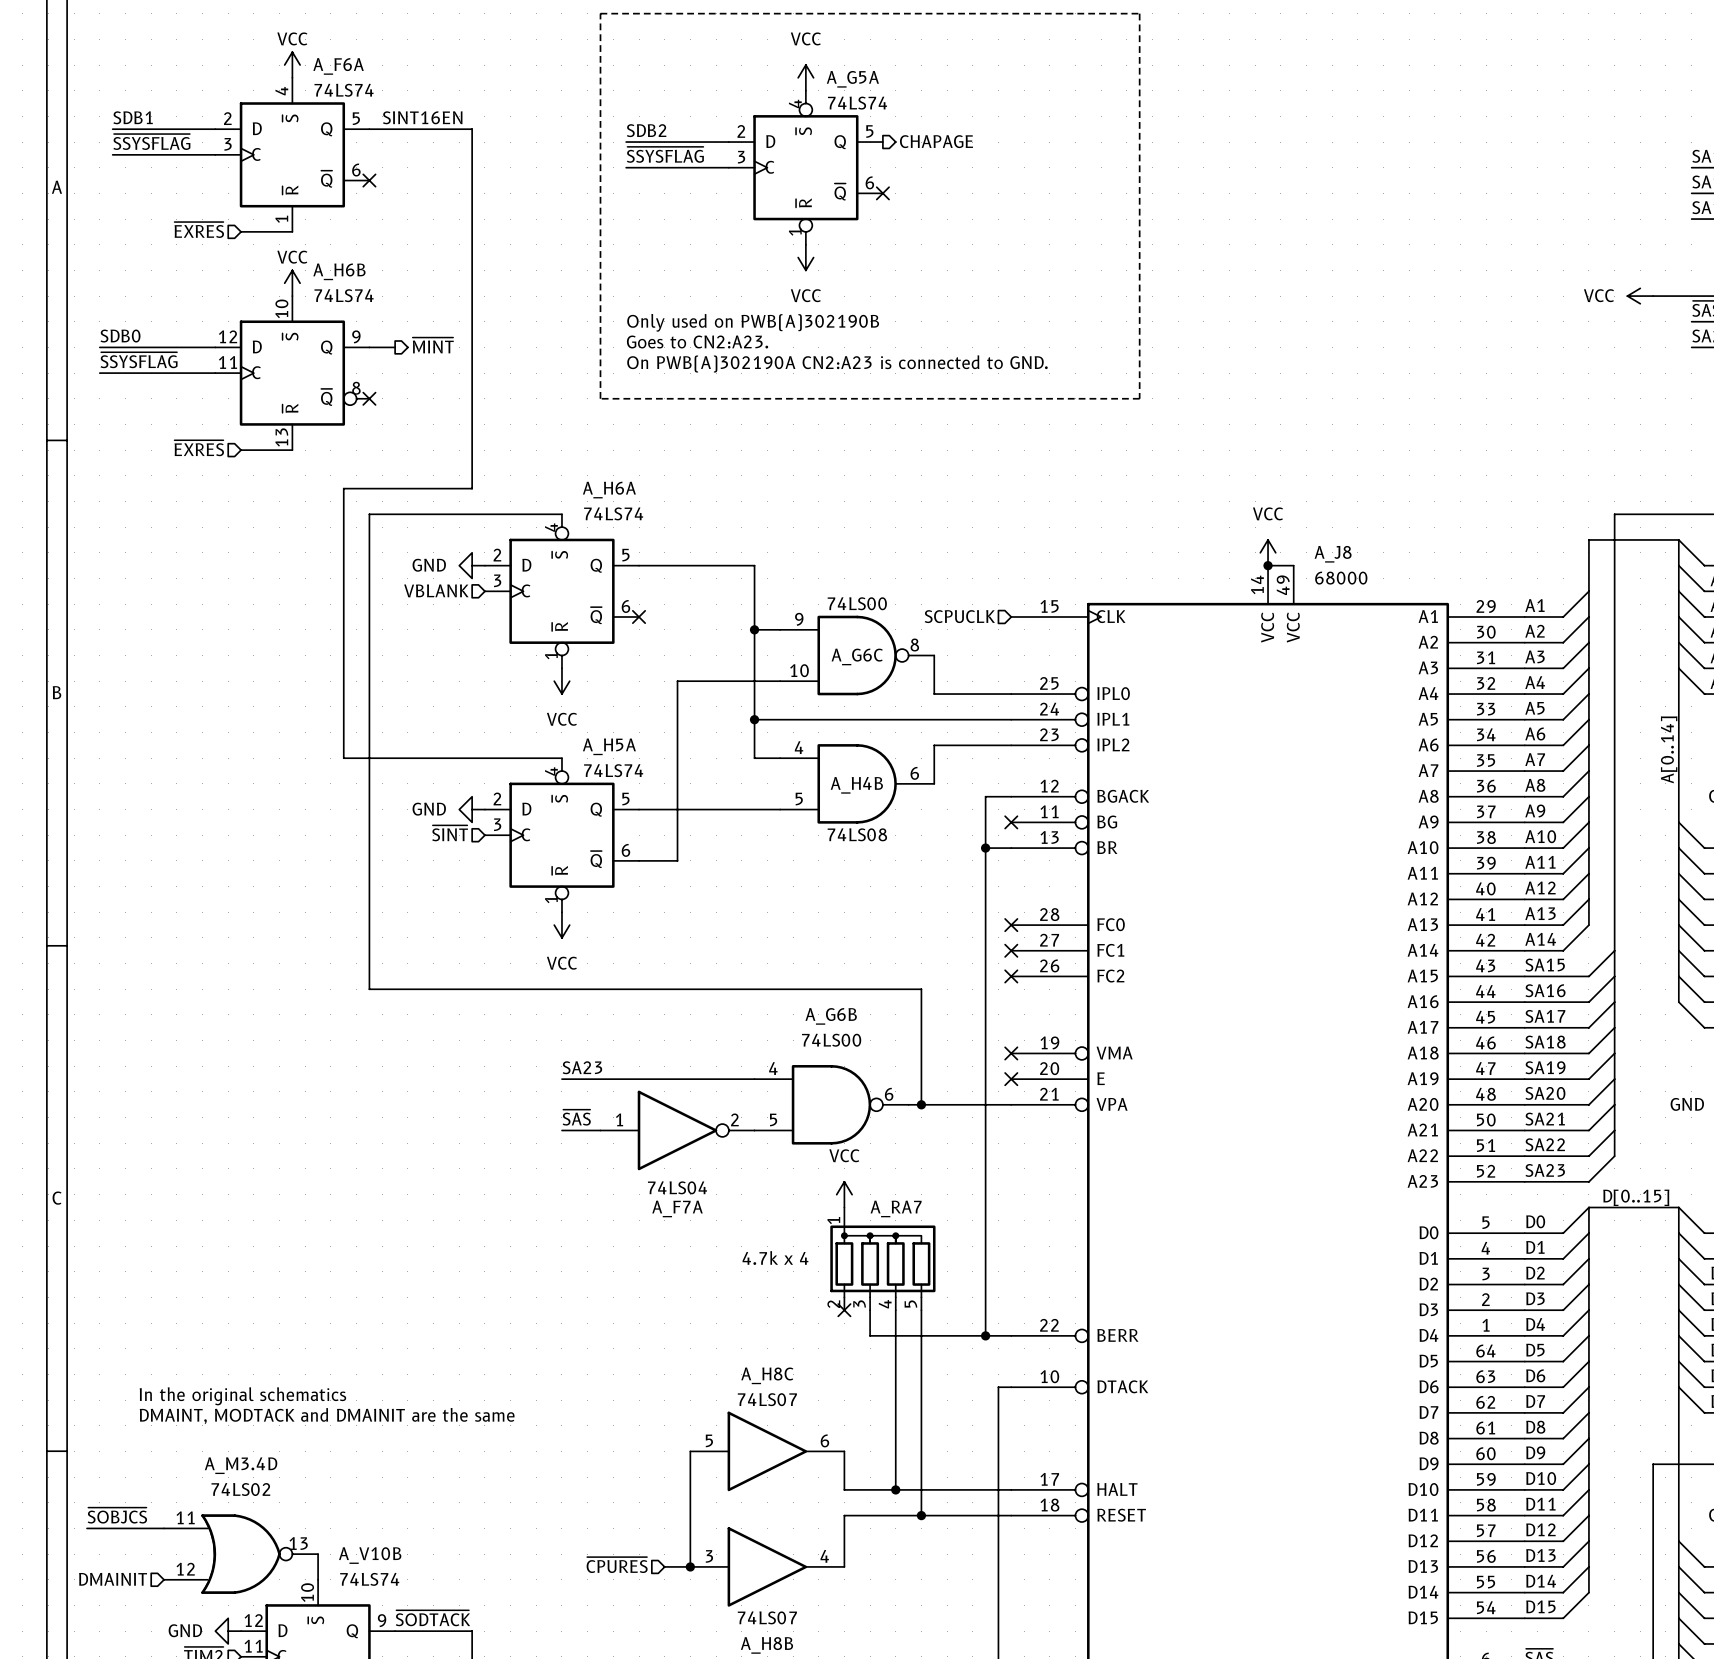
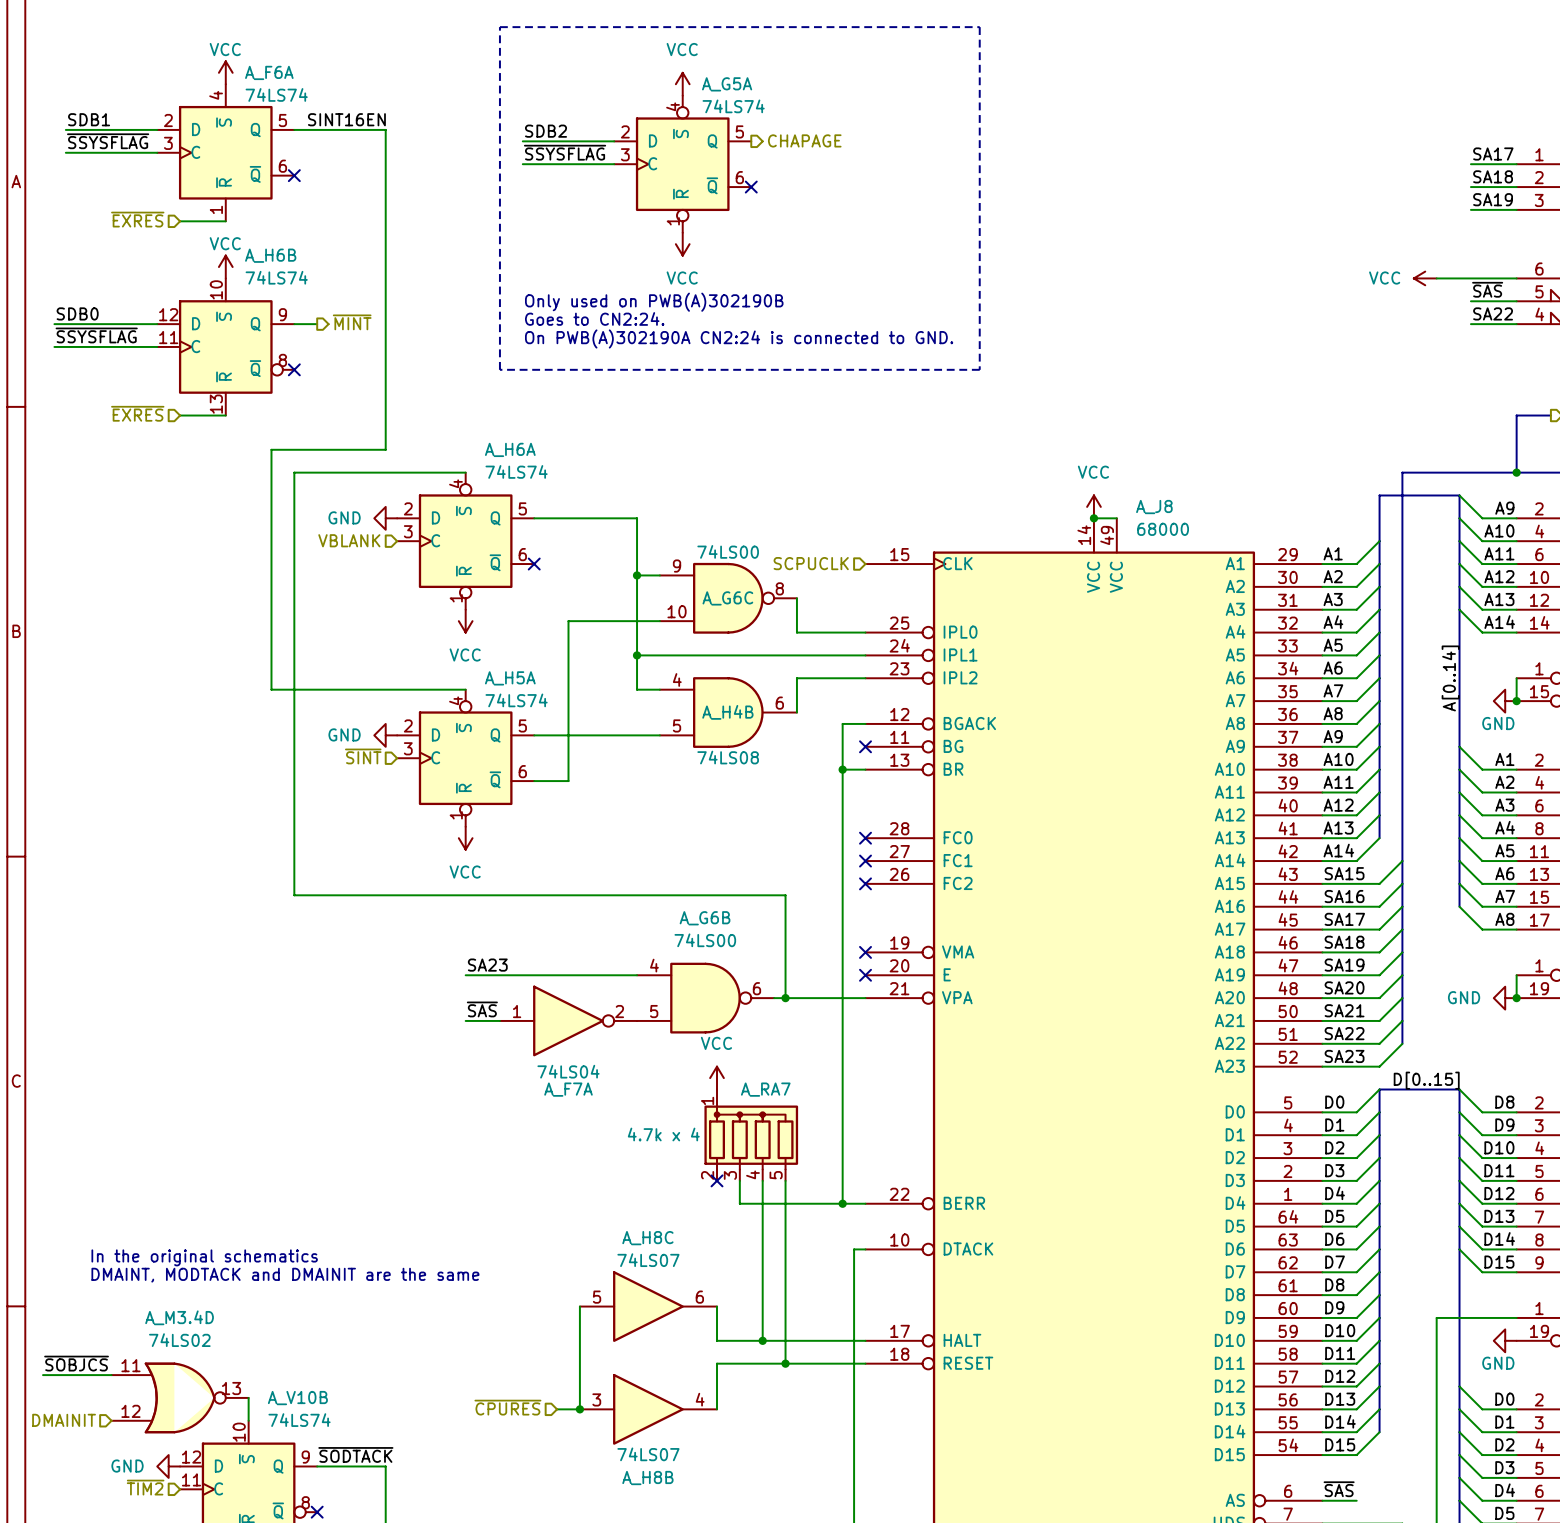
text: Goes to CN2:A23. (697, 341) -> Goes to CN2:24. (594, 318)
text: On PWB(A)302190A CN2:A23 is connected to GND. (837, 363) -> On PWB(A)302190A CN2:24 is connected to GND. (739, 338)

